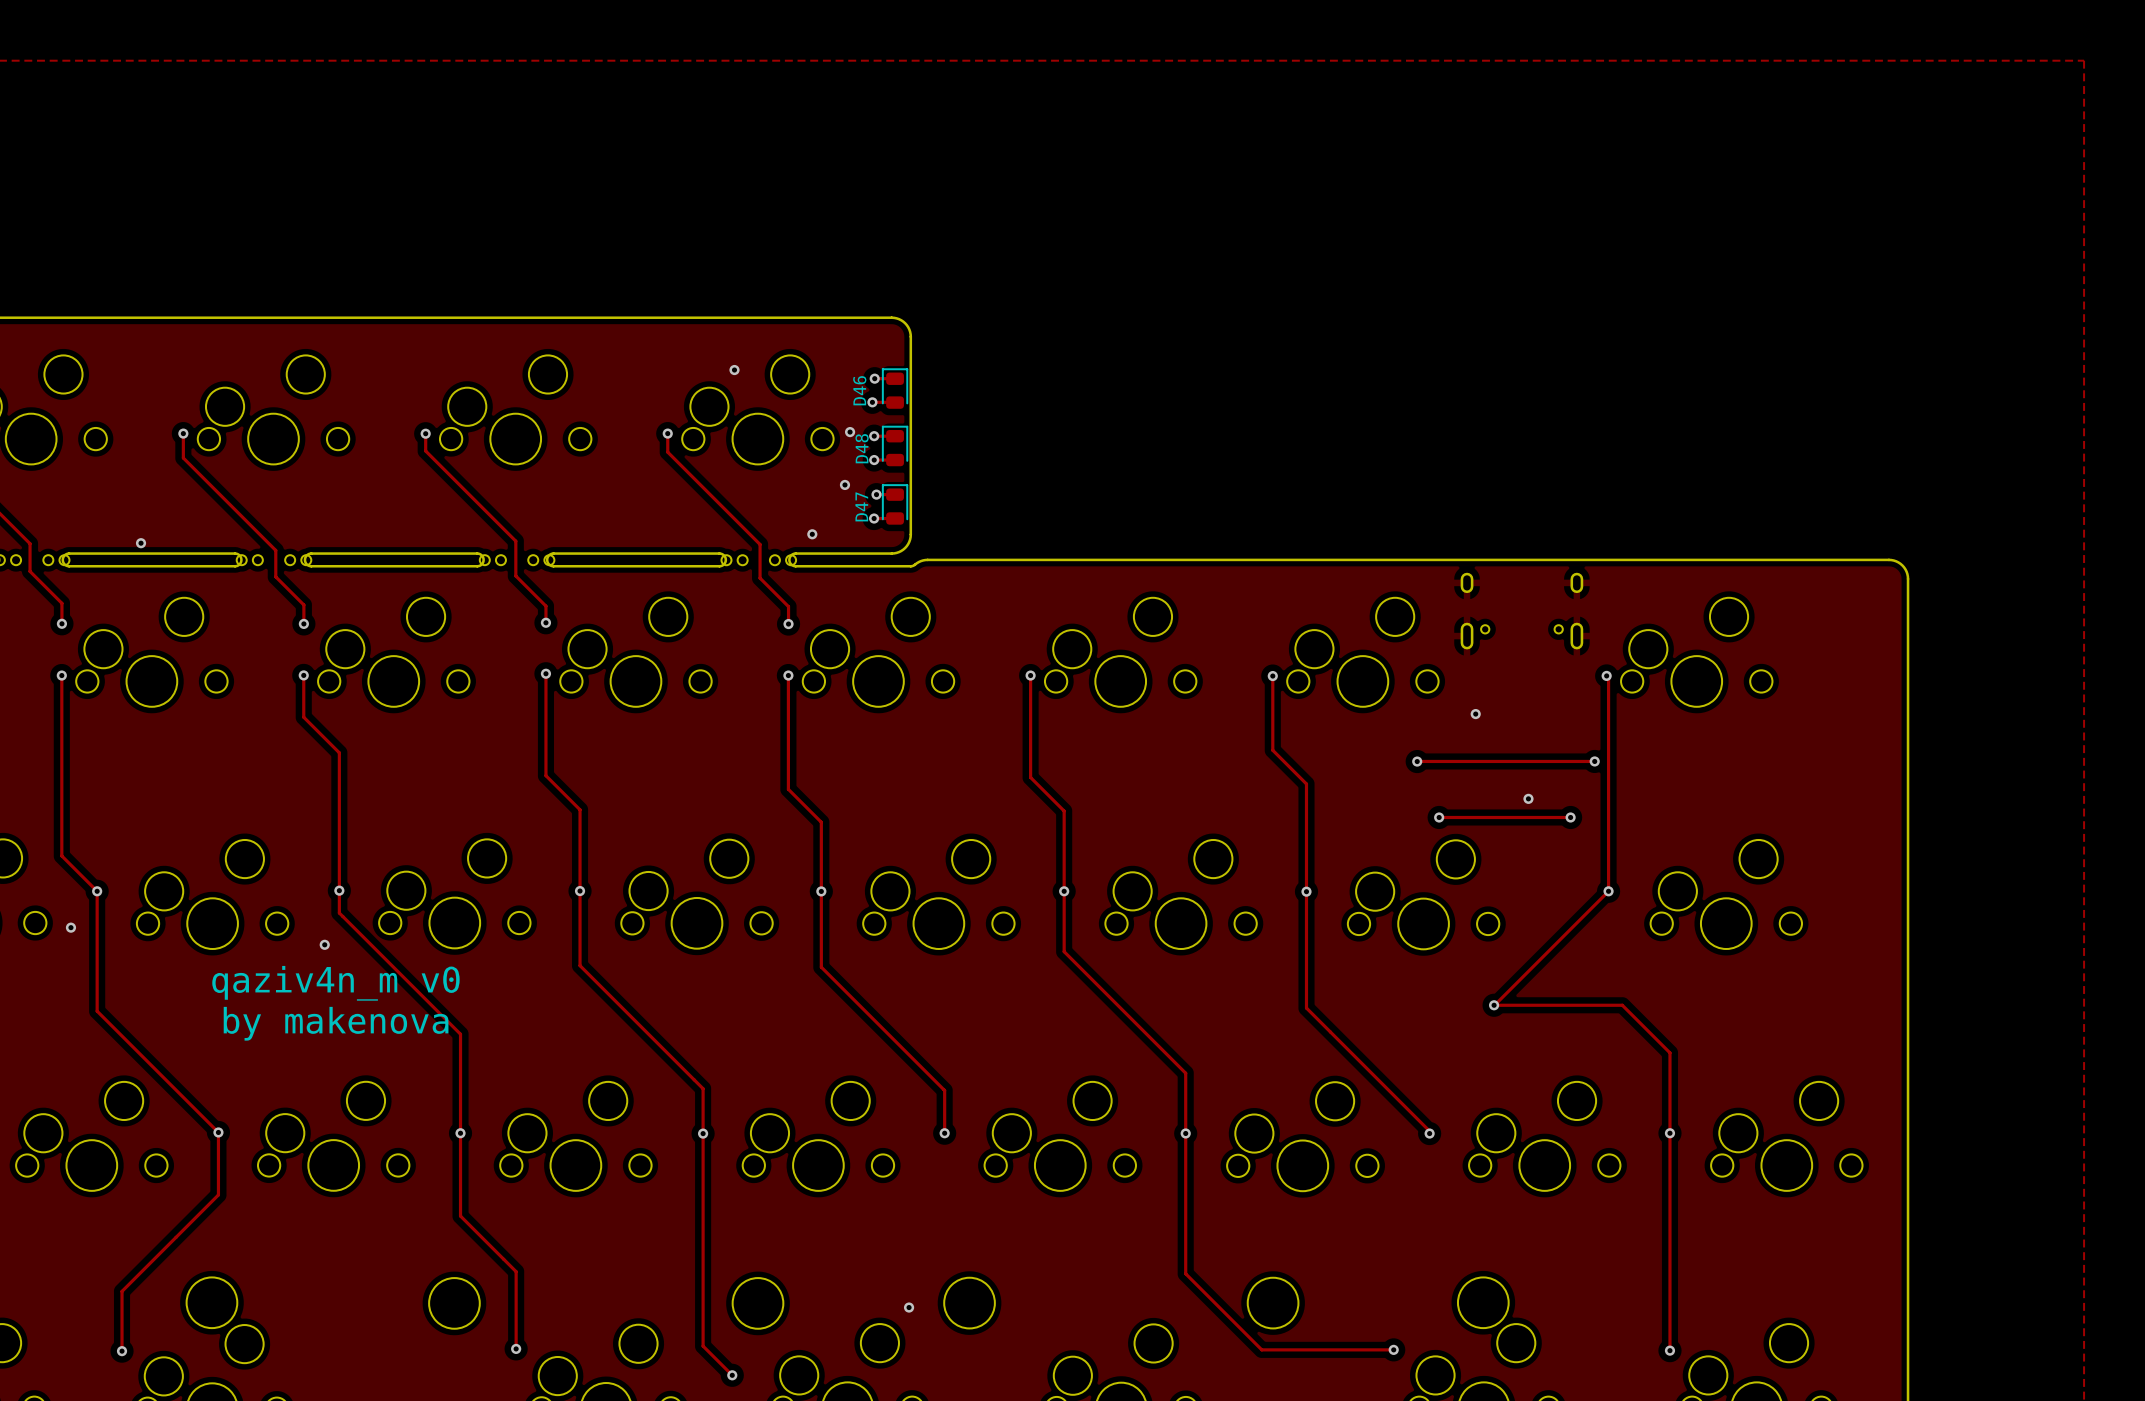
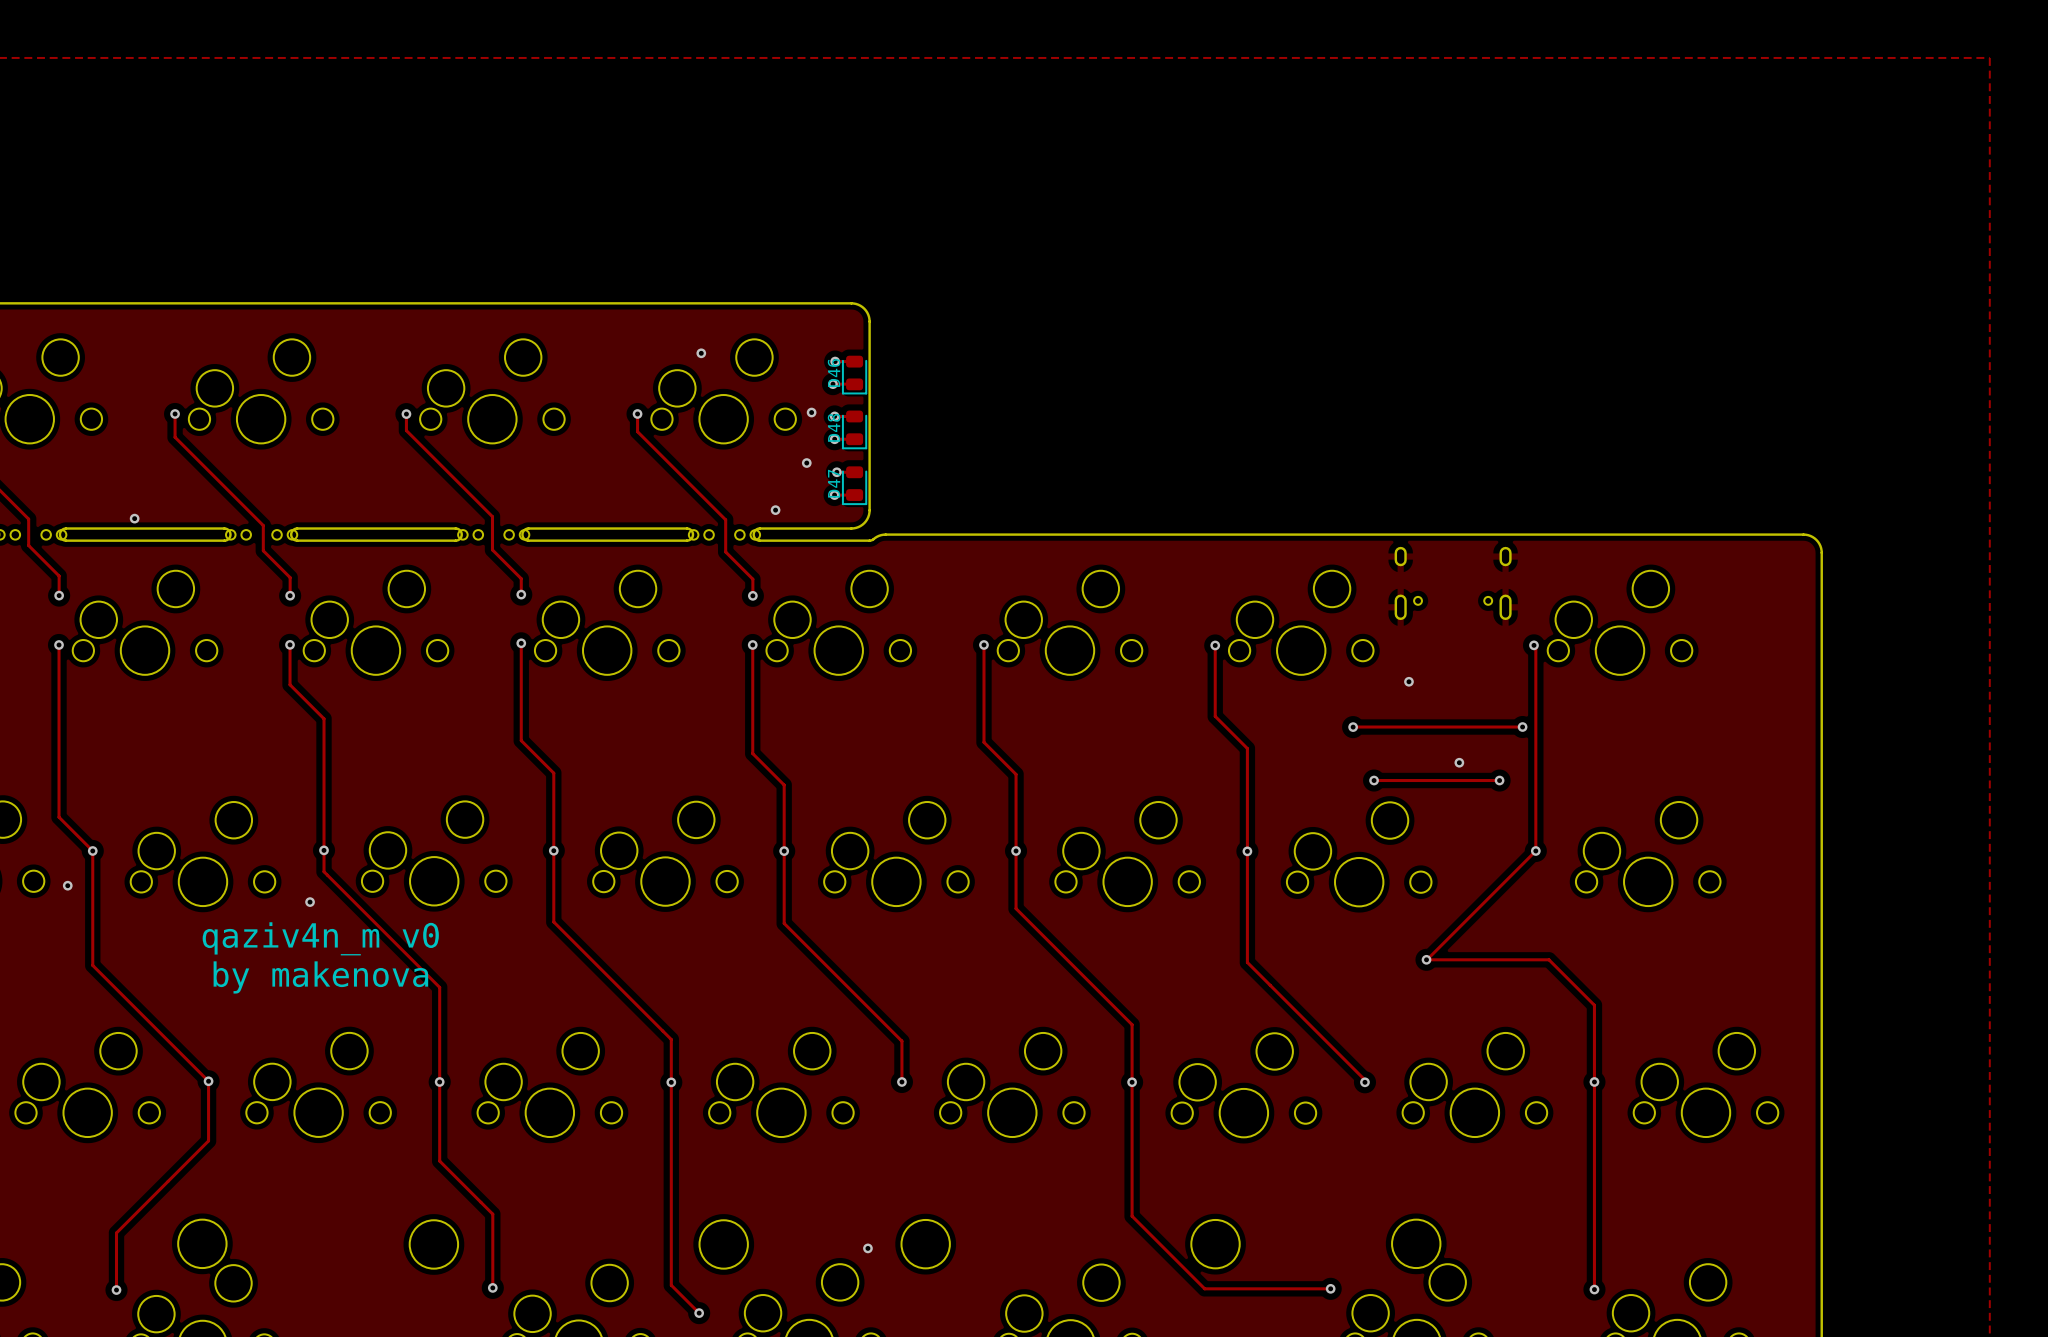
D46 rotation: 0° (895, 388) -> 180° (854, 374)
D48 rotation: 0° (895, 446) -> 180° (854, 429)
D47 rotation: 0° (895, 504) -> 180° (854, 485)

